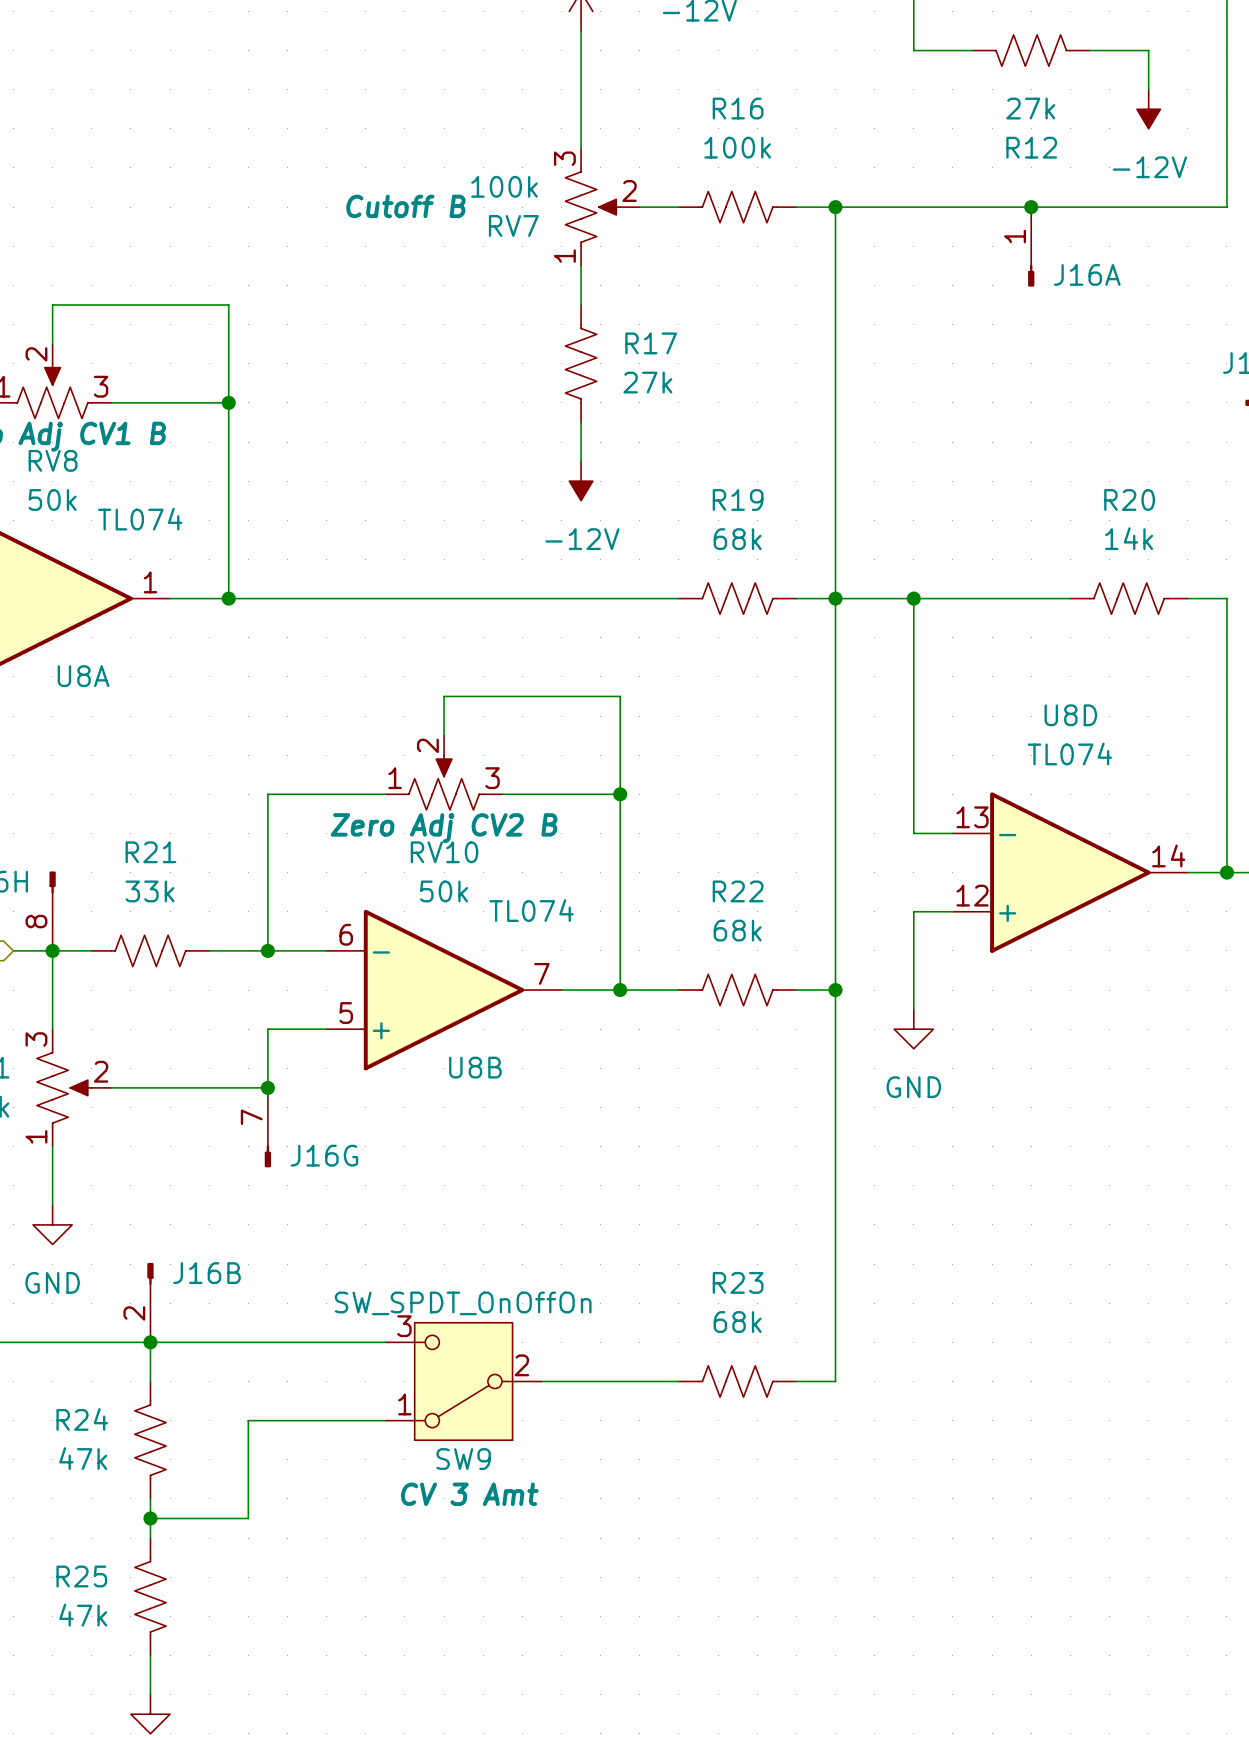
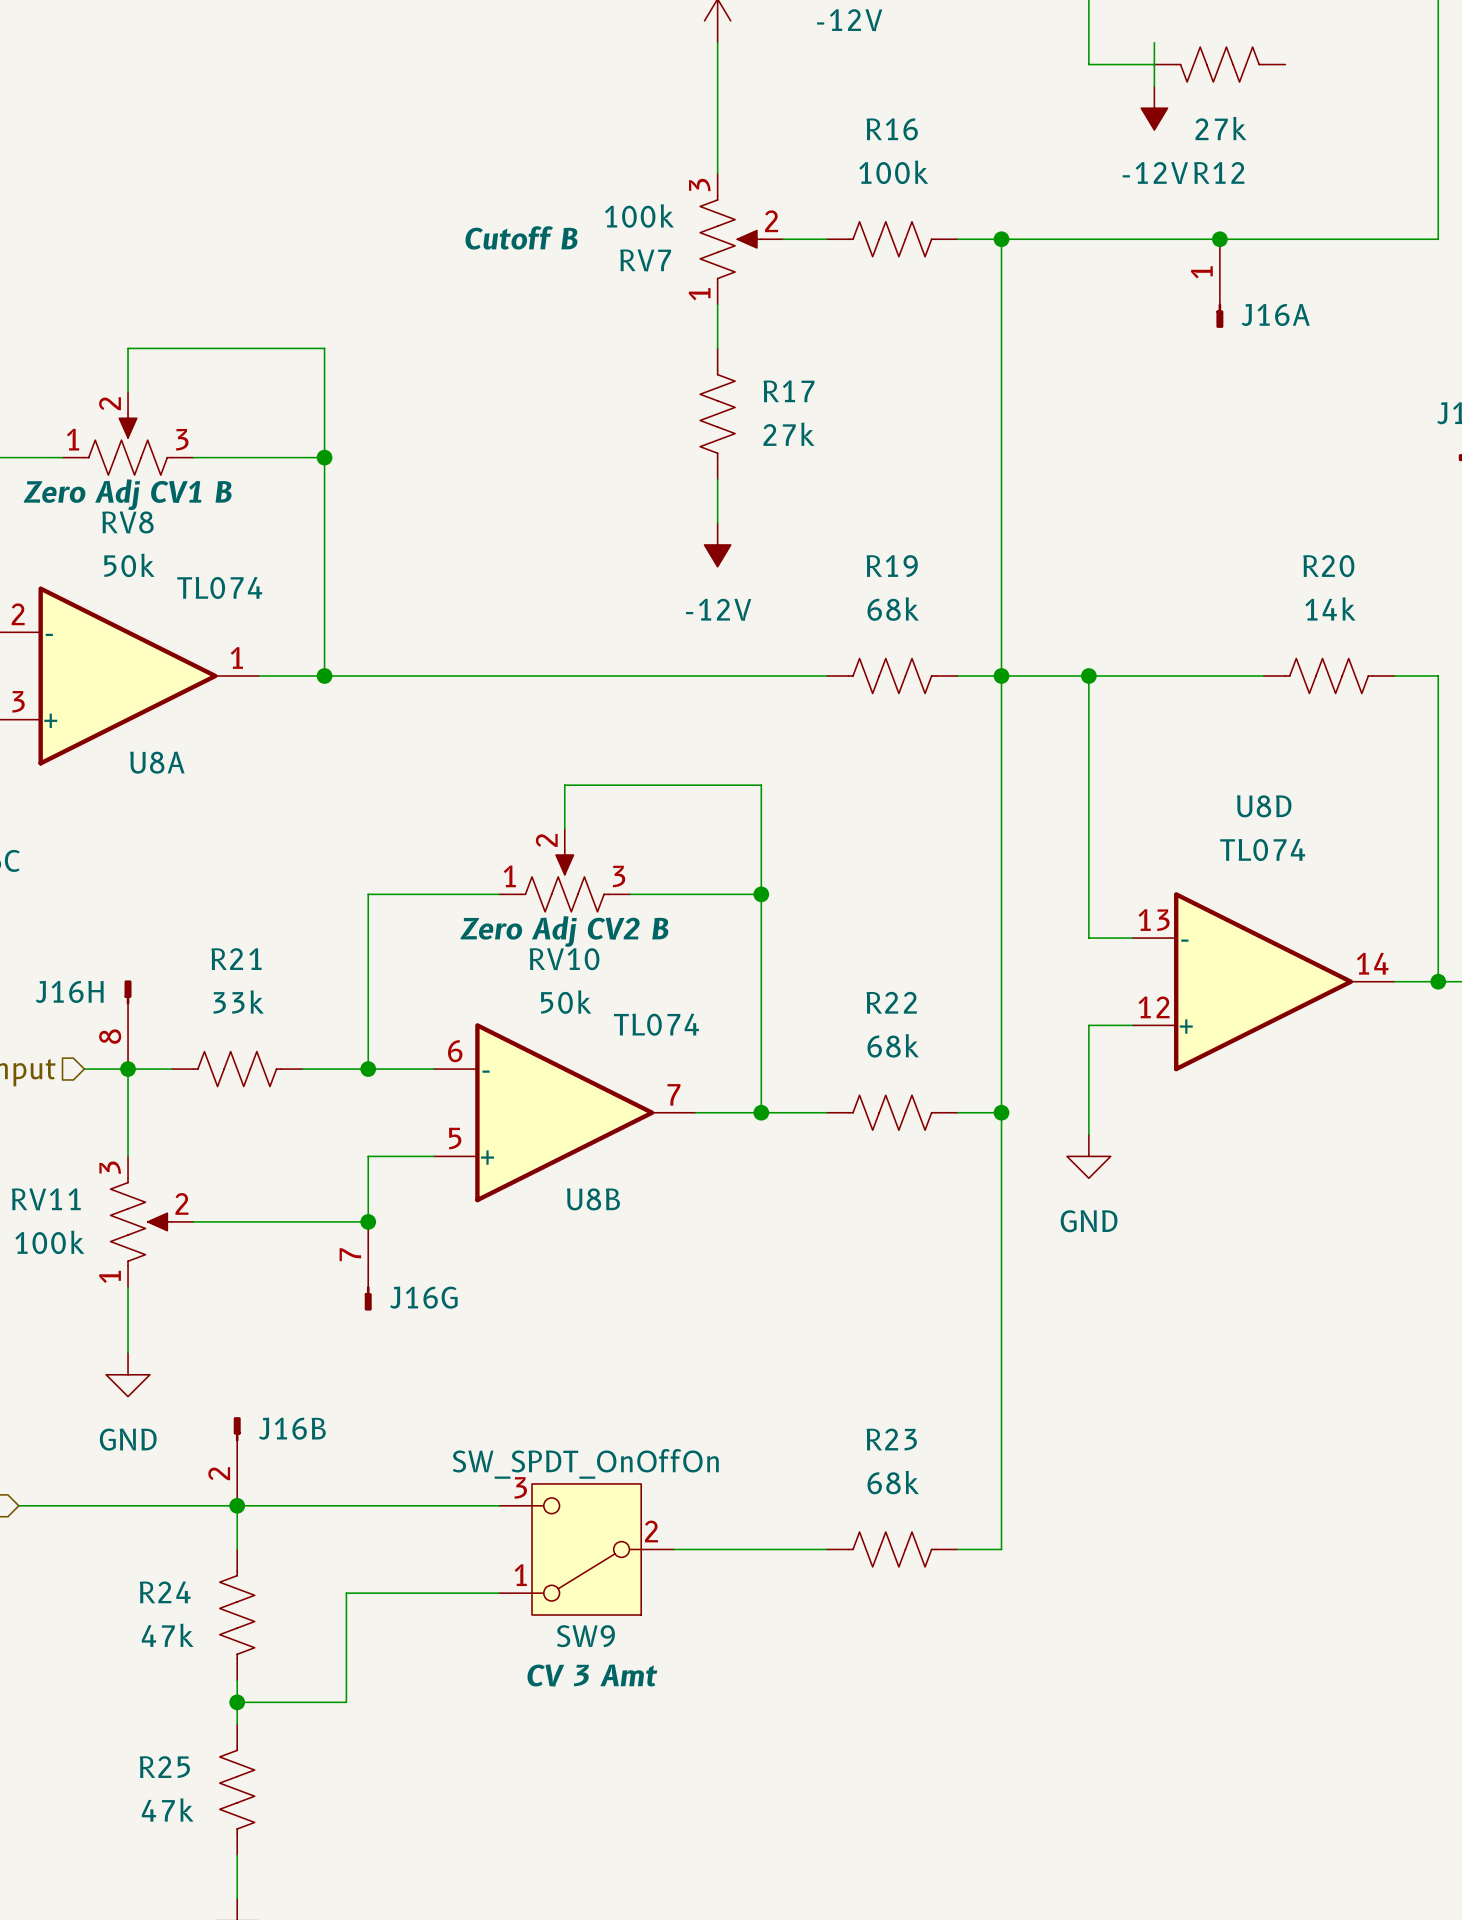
wire: none -> (1154, 42) (1154, 86)
wire: (1089, 50) (1148, 50) (1148, 89) -> none
power symbol position: -12V (1148, 109) -> -12V (1154, 108)

